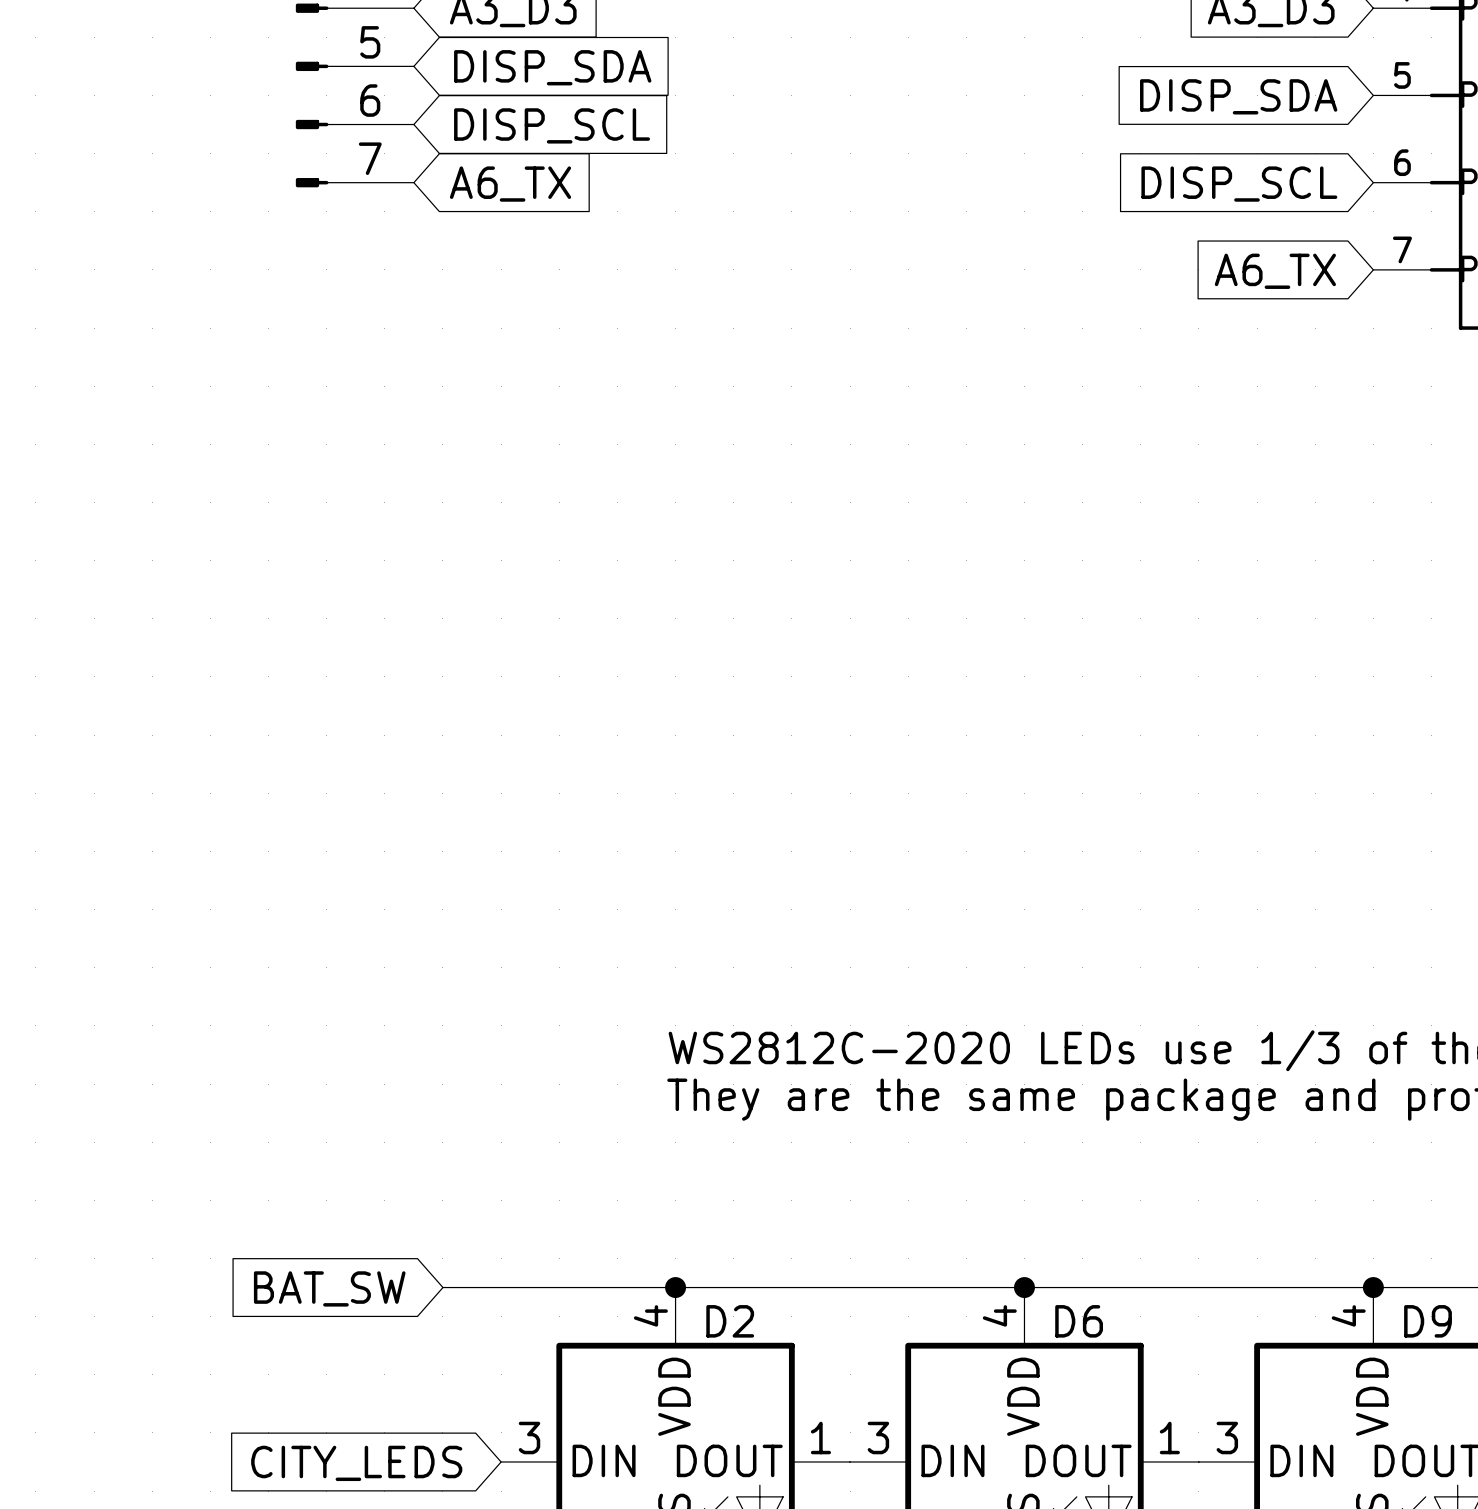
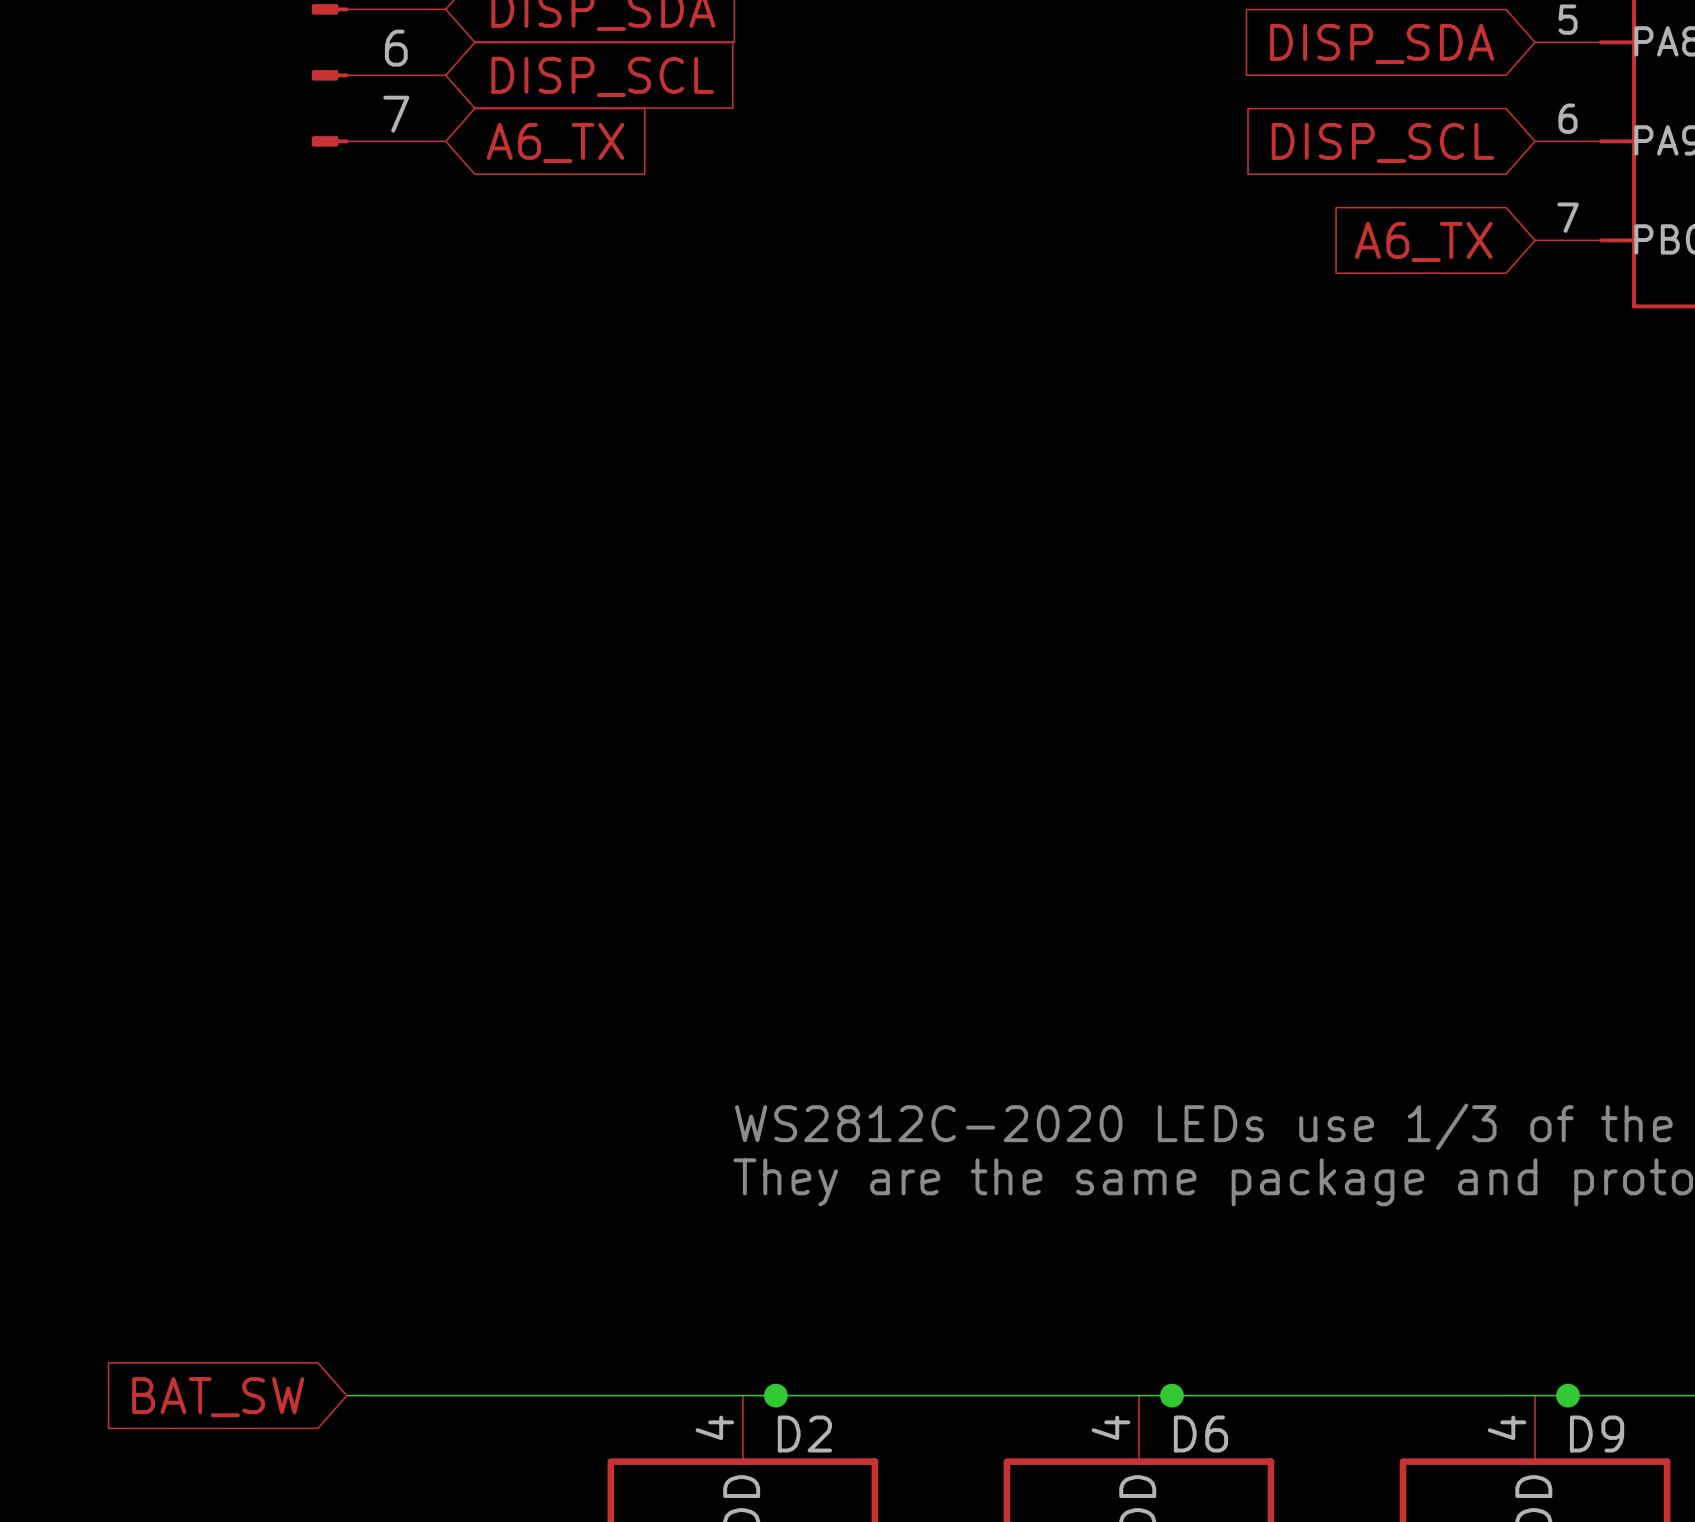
wire: none -> (346, 1395) (478, 1395)
junction position: (675, 1287) -> (775, 1395)
junction position: (1024, 1287) -> (1171, 1395)
junction position: (1373, 1287) -> (1568, 1395)
global label position: BAT_SW (329, 1288) -> BAT_SW (218, 1397)

